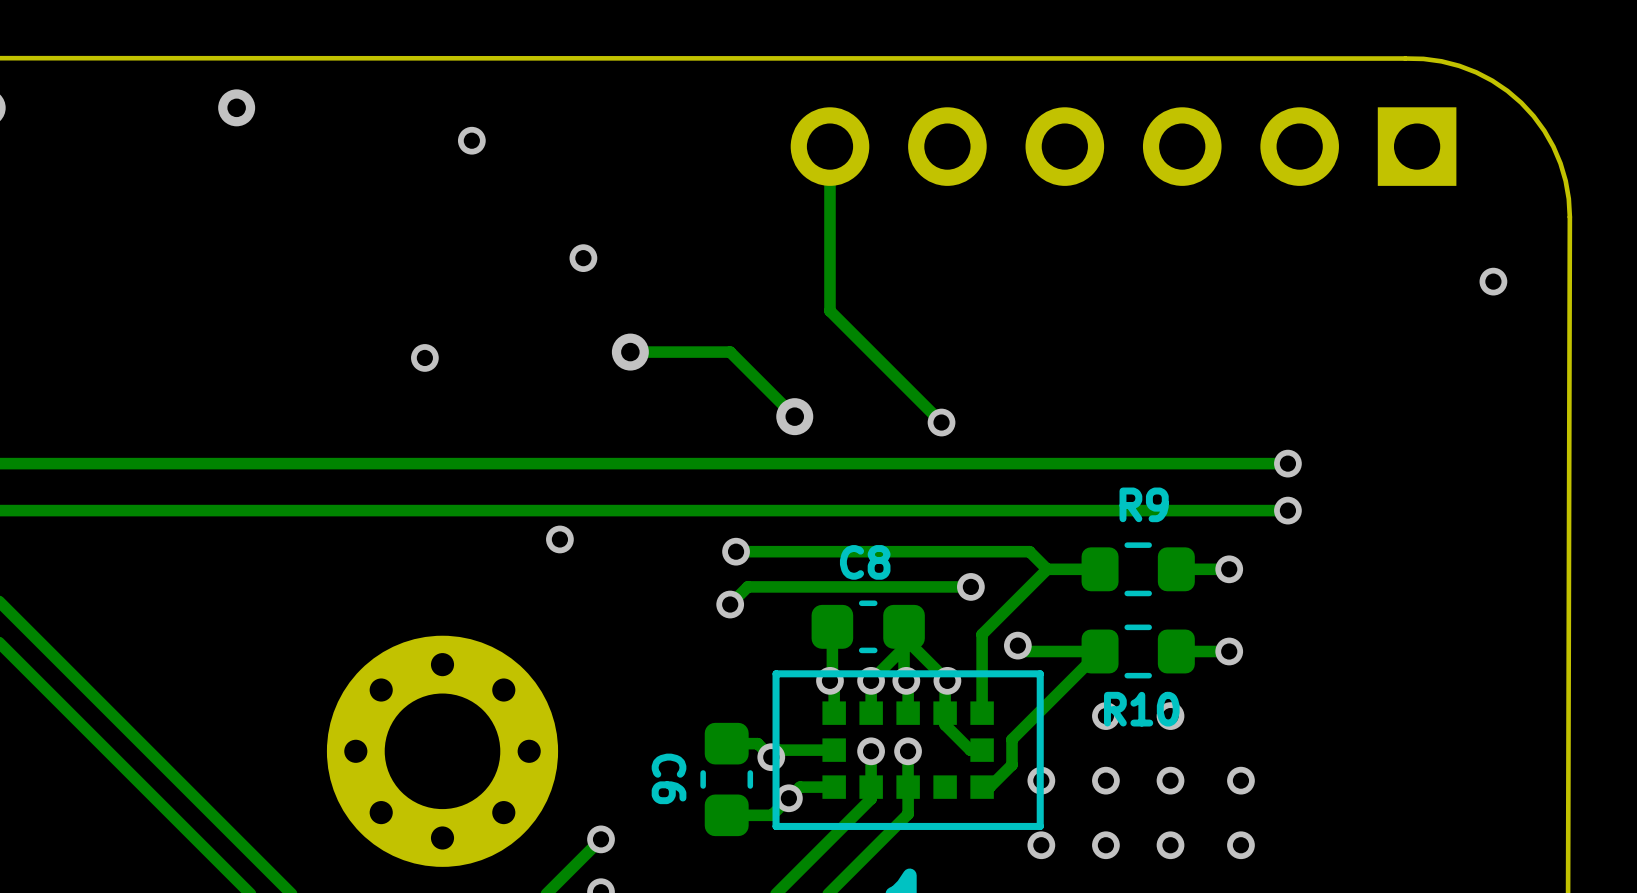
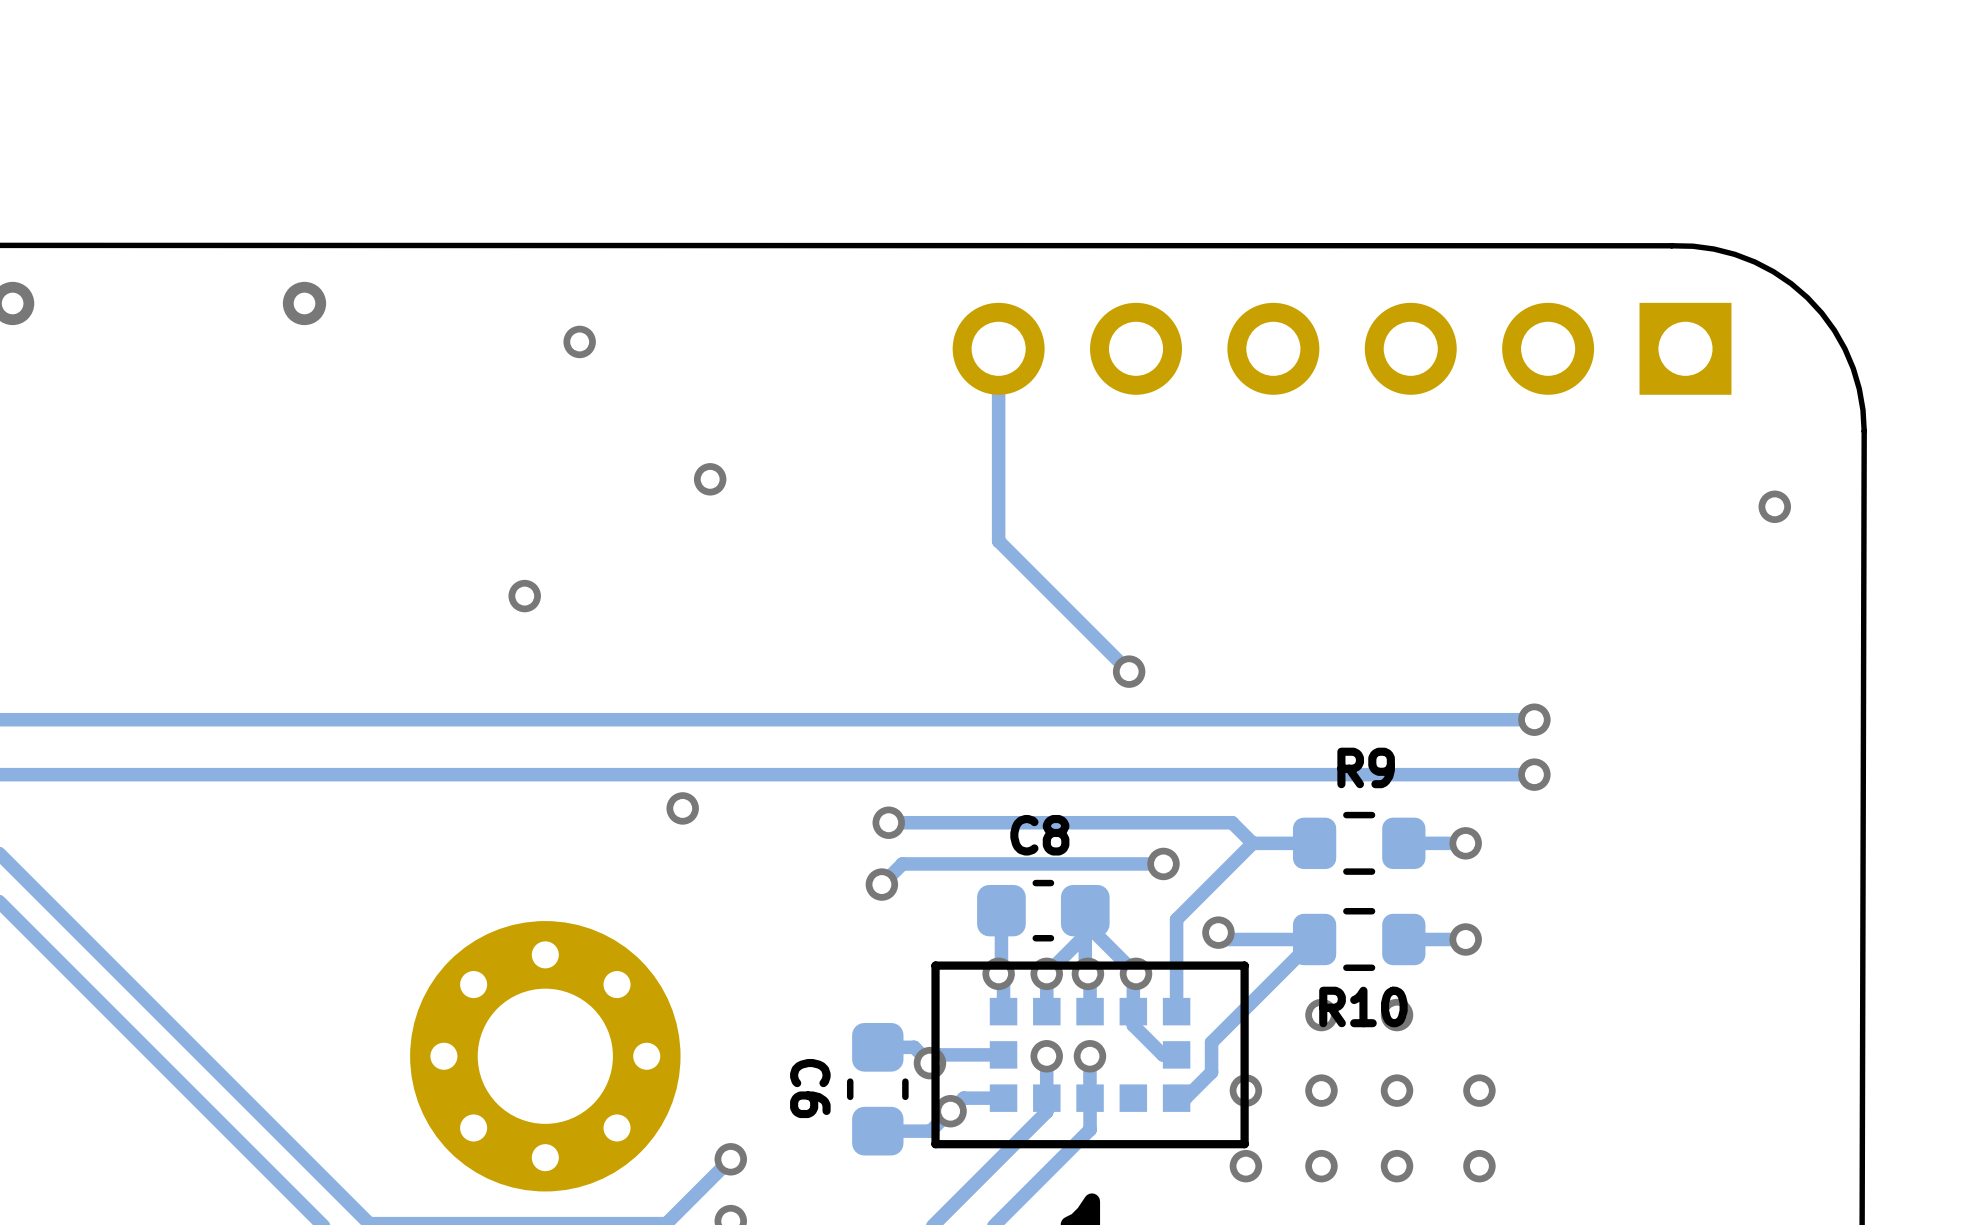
track: (630, 352) (730, 352) (794, 416) -> none
via: (630, 352) -> none
via: (794, 416) -> none

